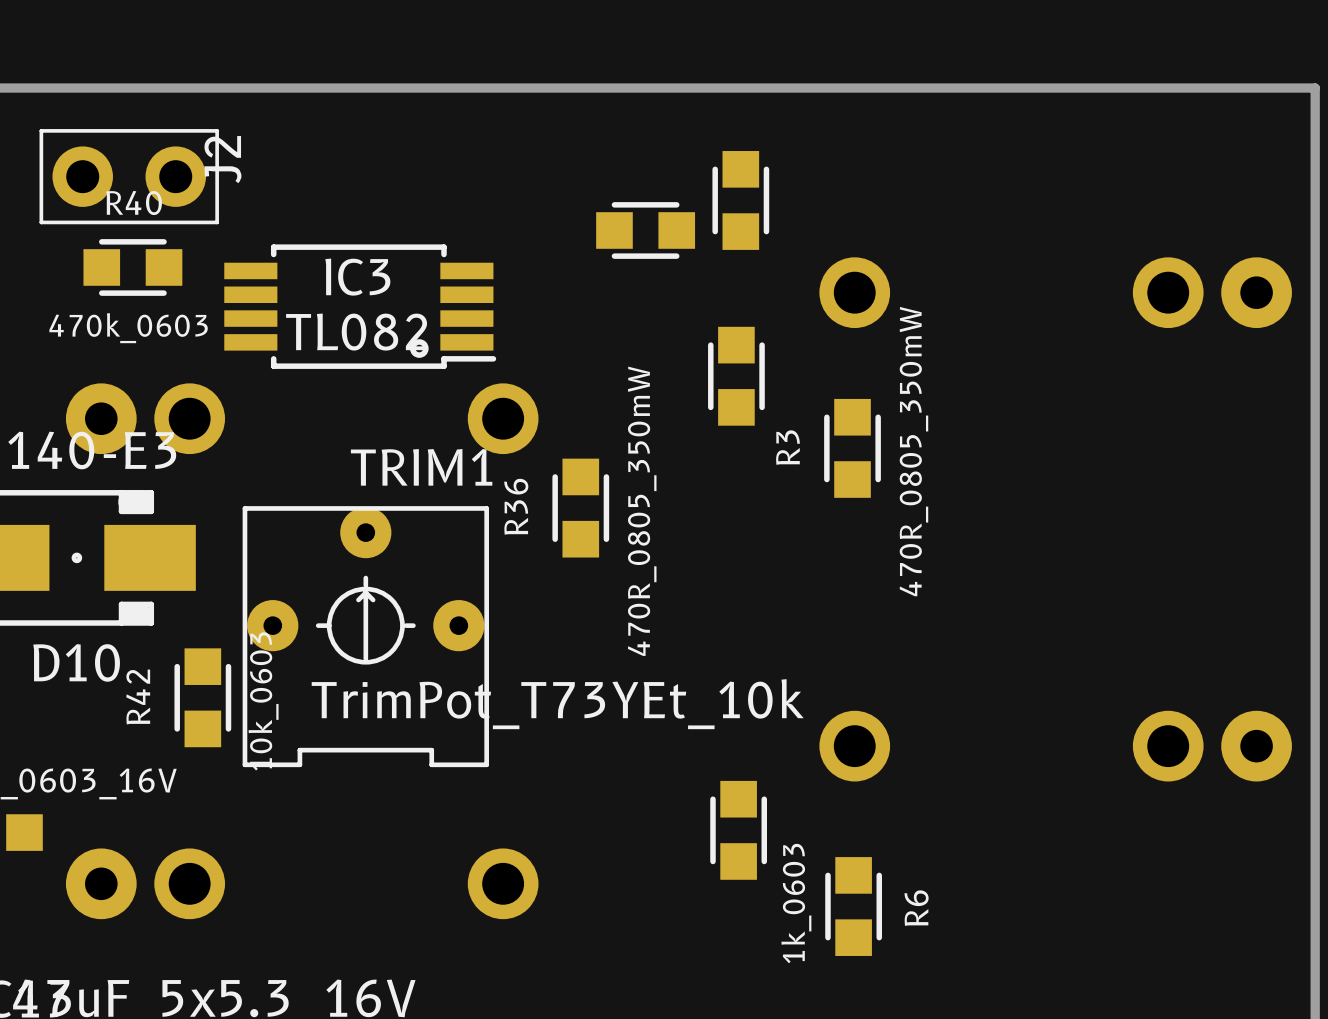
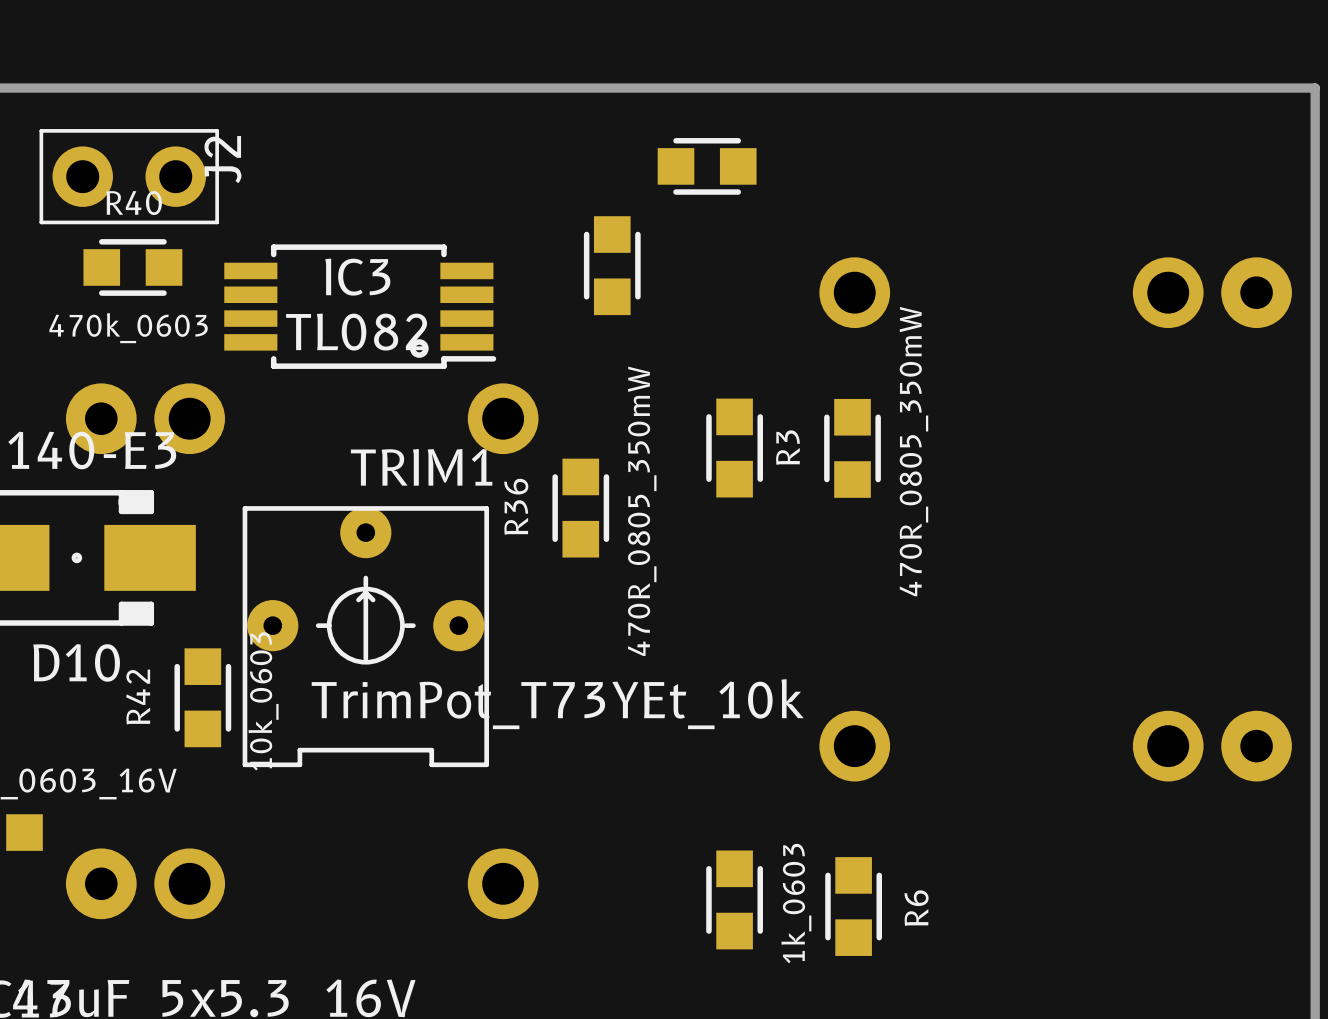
part: none -> (707, 166)
part: (740, 200) -> none
part: (645, 230) -> none
part: none -> (612, 265)
part position: (736, 376) -> (734, 448)
part position: (738, 830) -> (734, 899)

